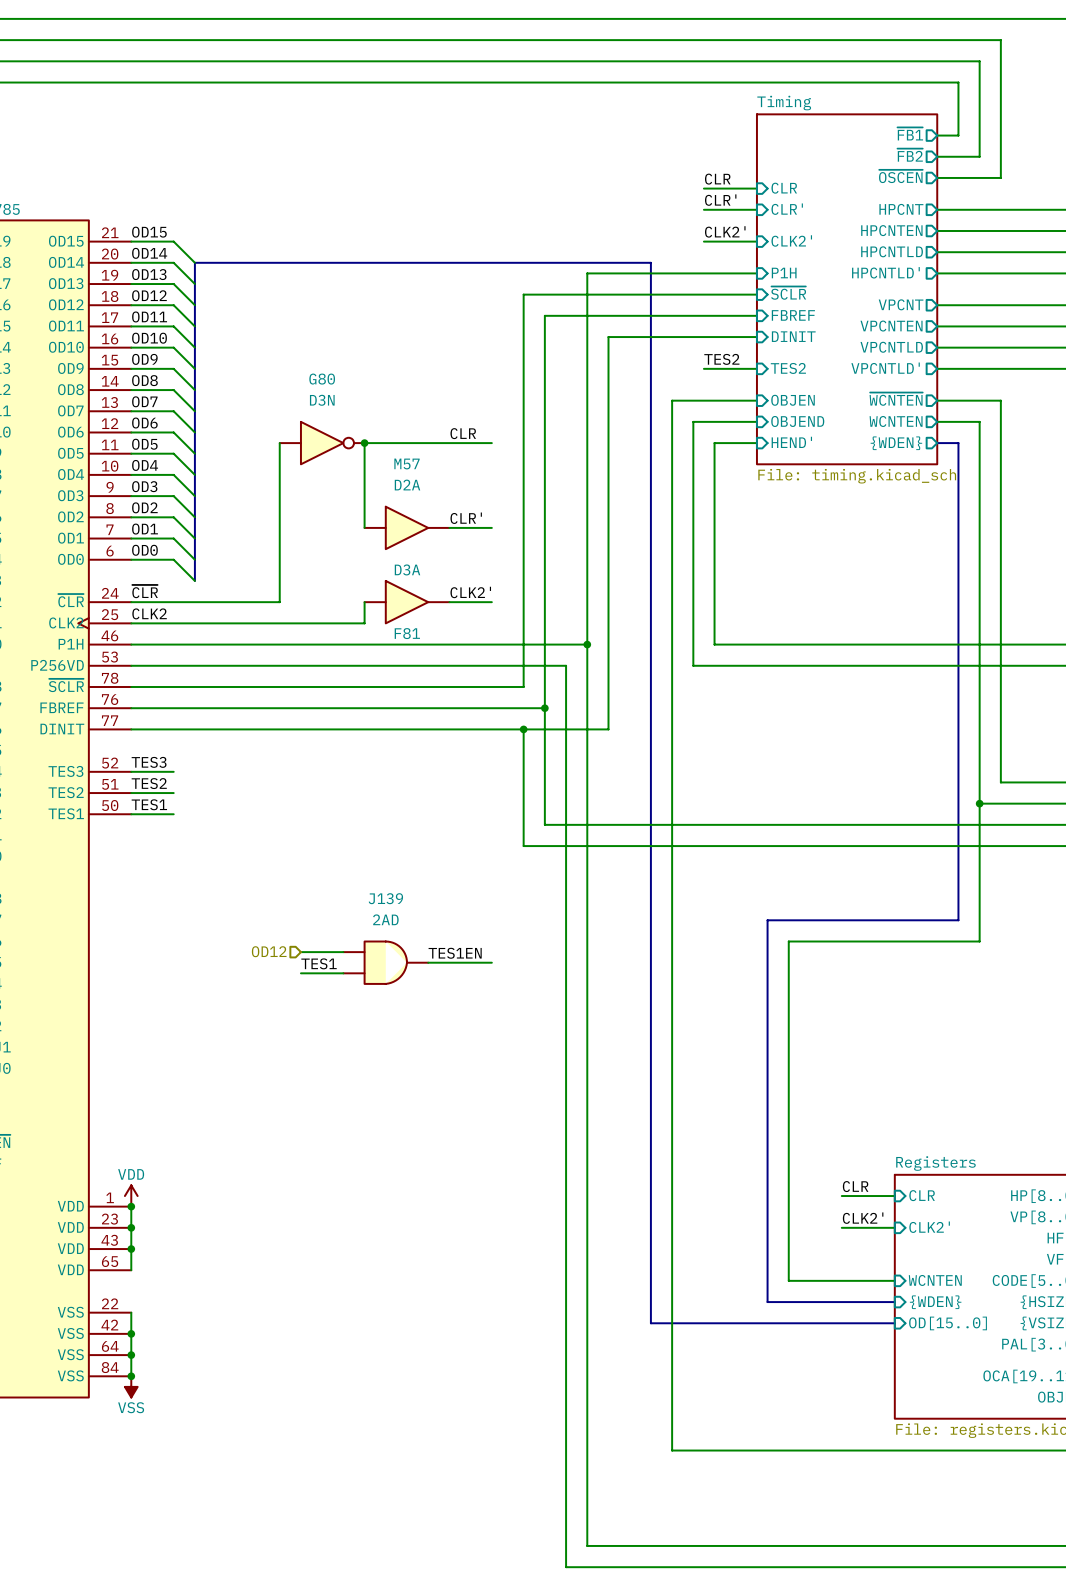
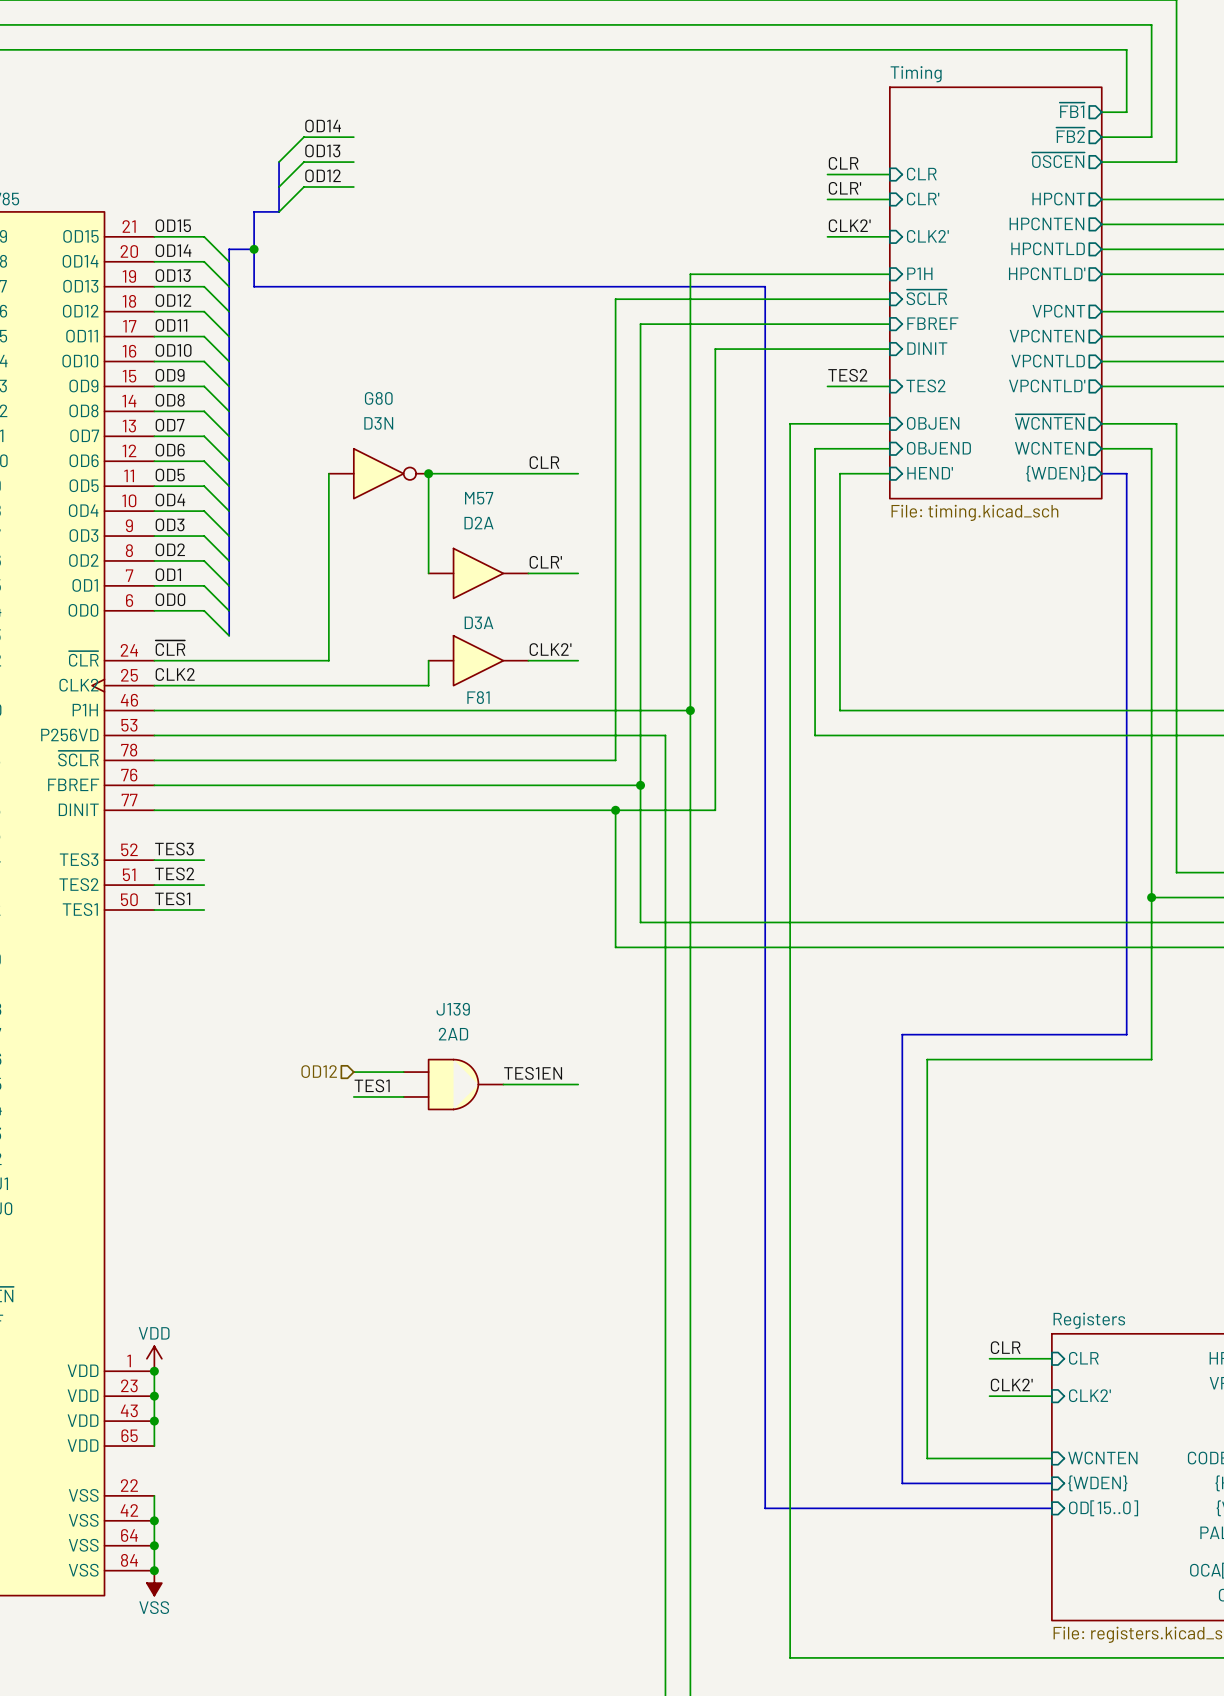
label: none -> OD14 (323, 126)
wire: none -> (353, 137) (303, 137) (279, 162)
label: none -> OD13 (322, 150)
wire: none -> (353, 162) (303, 162) (279, 186)
label: none -> OD12 (323, 175)
wire: none -> (353, 186) (303, 186) (279, 211)
bus: none -> (254, 249) (229, 249) (229, 261)
junction: none -> (254, 249)
bus: (194, 262) (650, 262) (650, 284) -> (279, 162) (279, 211) (254, 211) (254, 286) (765, 286)

